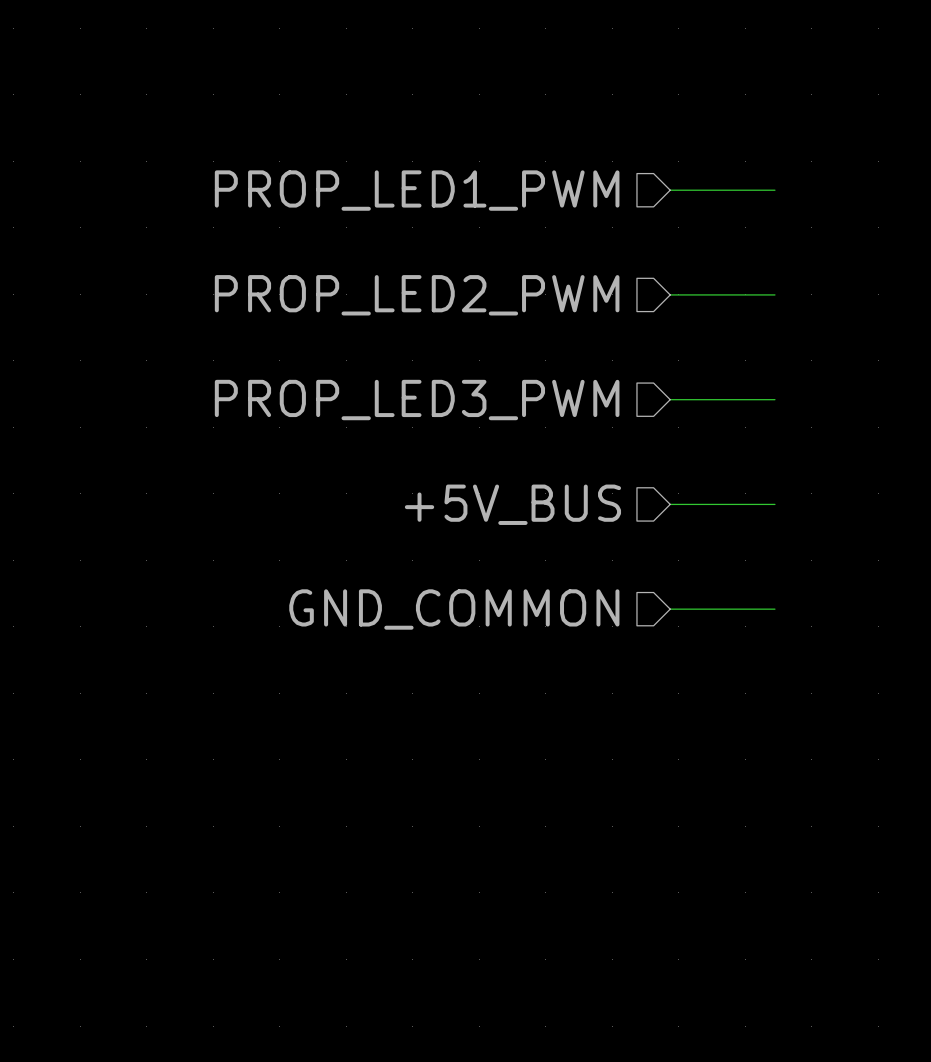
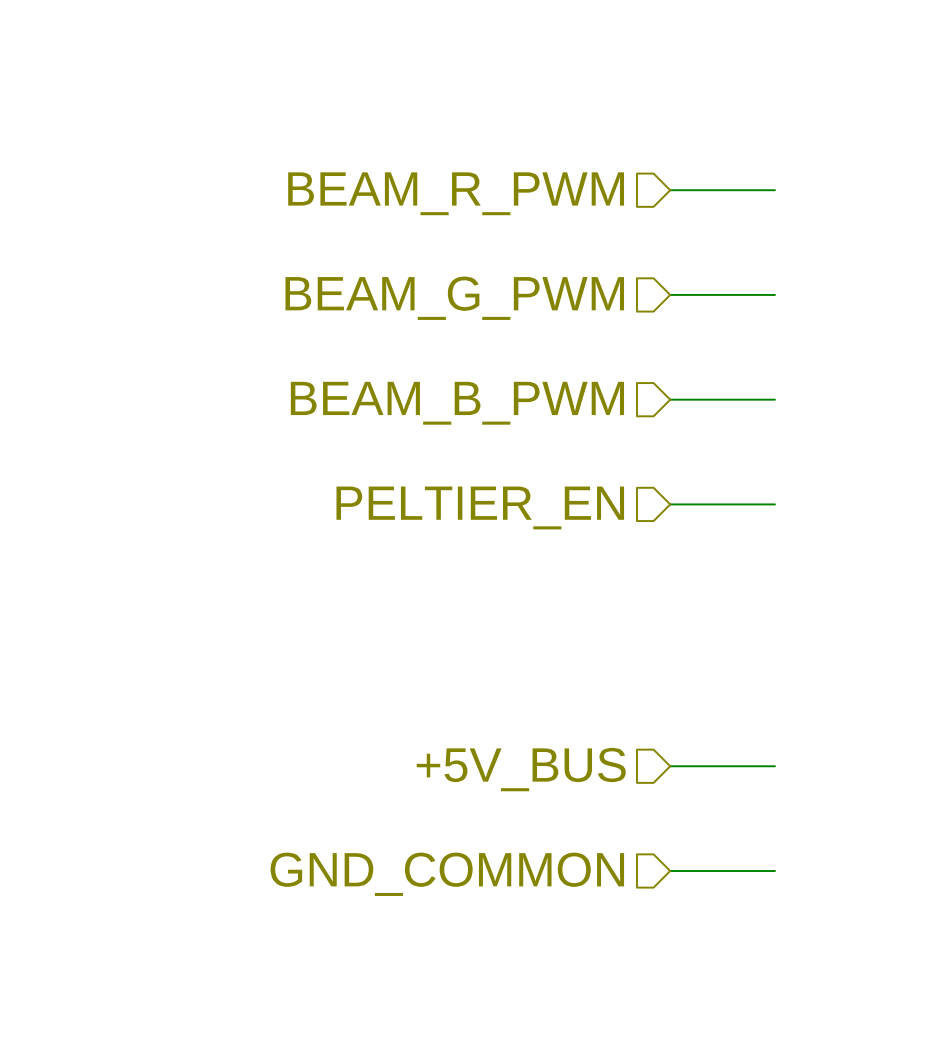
hierarchical label: PROP_LED1_PWM (417, 190) -> BEAM_R_PWM (456, 193)
hierarchical label: PROP_LED2_PWM (417, 295) -> BEAM_G_PWM (454, 298)
hierarchical label: PROP_LED3_PWM (417, 400) -> BEAM_B_PWM (457, 403)
hierarchical label: +5V_BUS (512, 504) -> PELTIER_EN (480, 507)
hierarchical label position: GND_COMMON (454, 609) -> GND_COMMON (447, 874)
wire: (670, 609) (774, 609) -> (670, 766) (774, 766)
hierarchical label: none -> +5V_BUS (521, 769)
wire: none -> (670, 870) (774, 870)

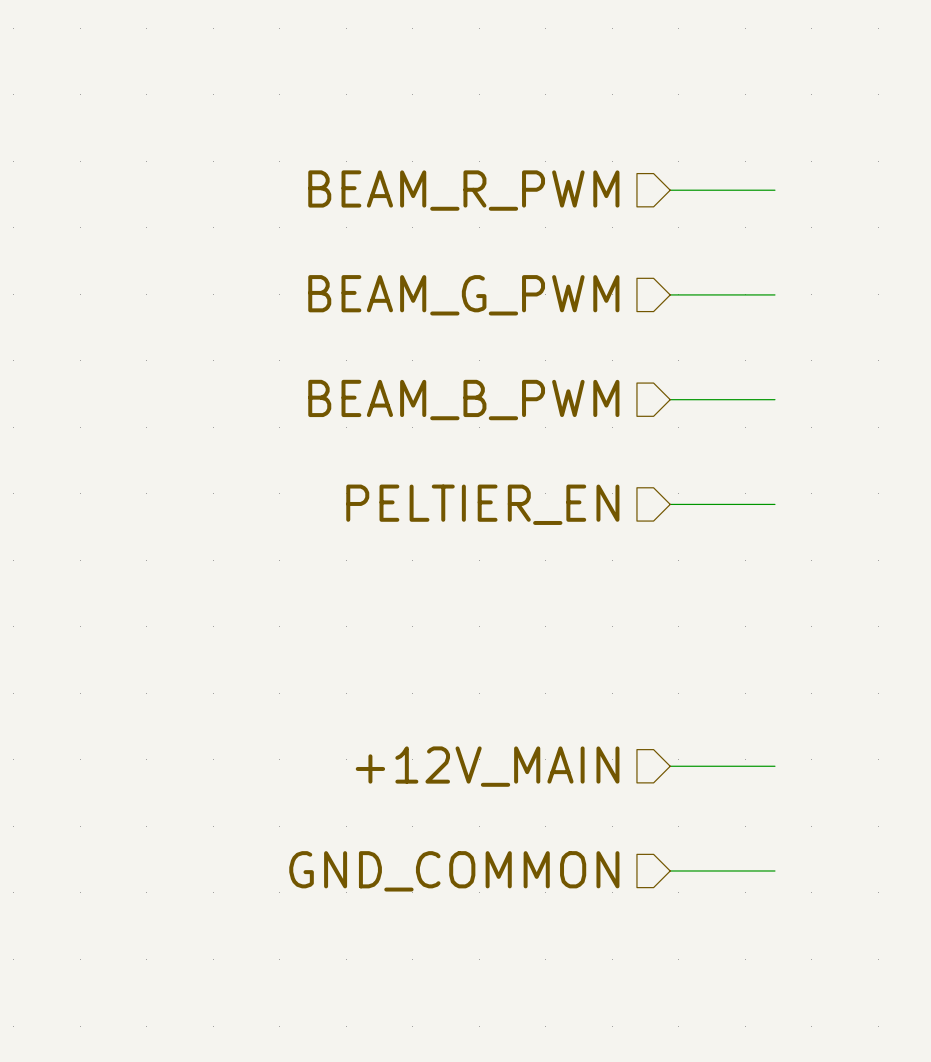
hierarchical label: +5V_BUS (521, 769) -> +12V_MAIN (487, 766)

